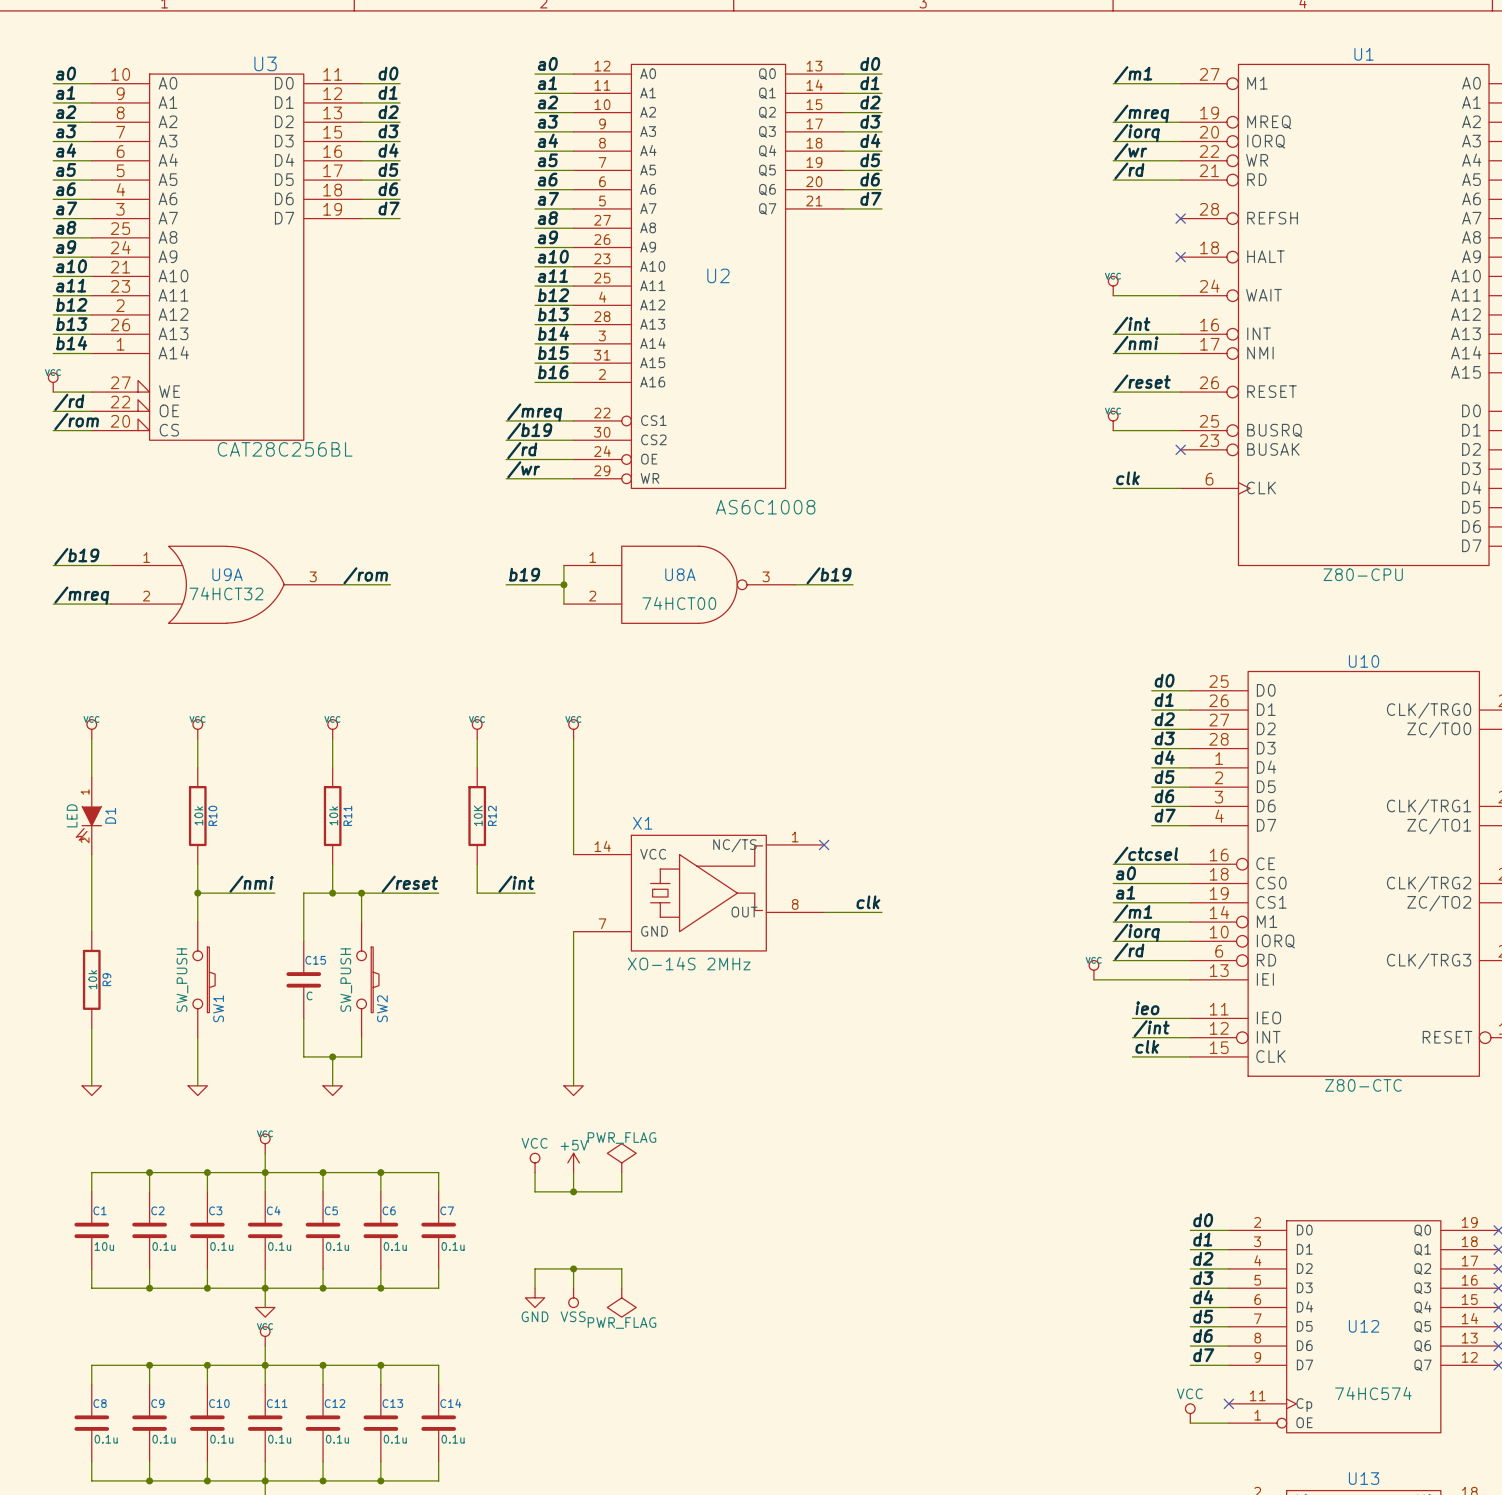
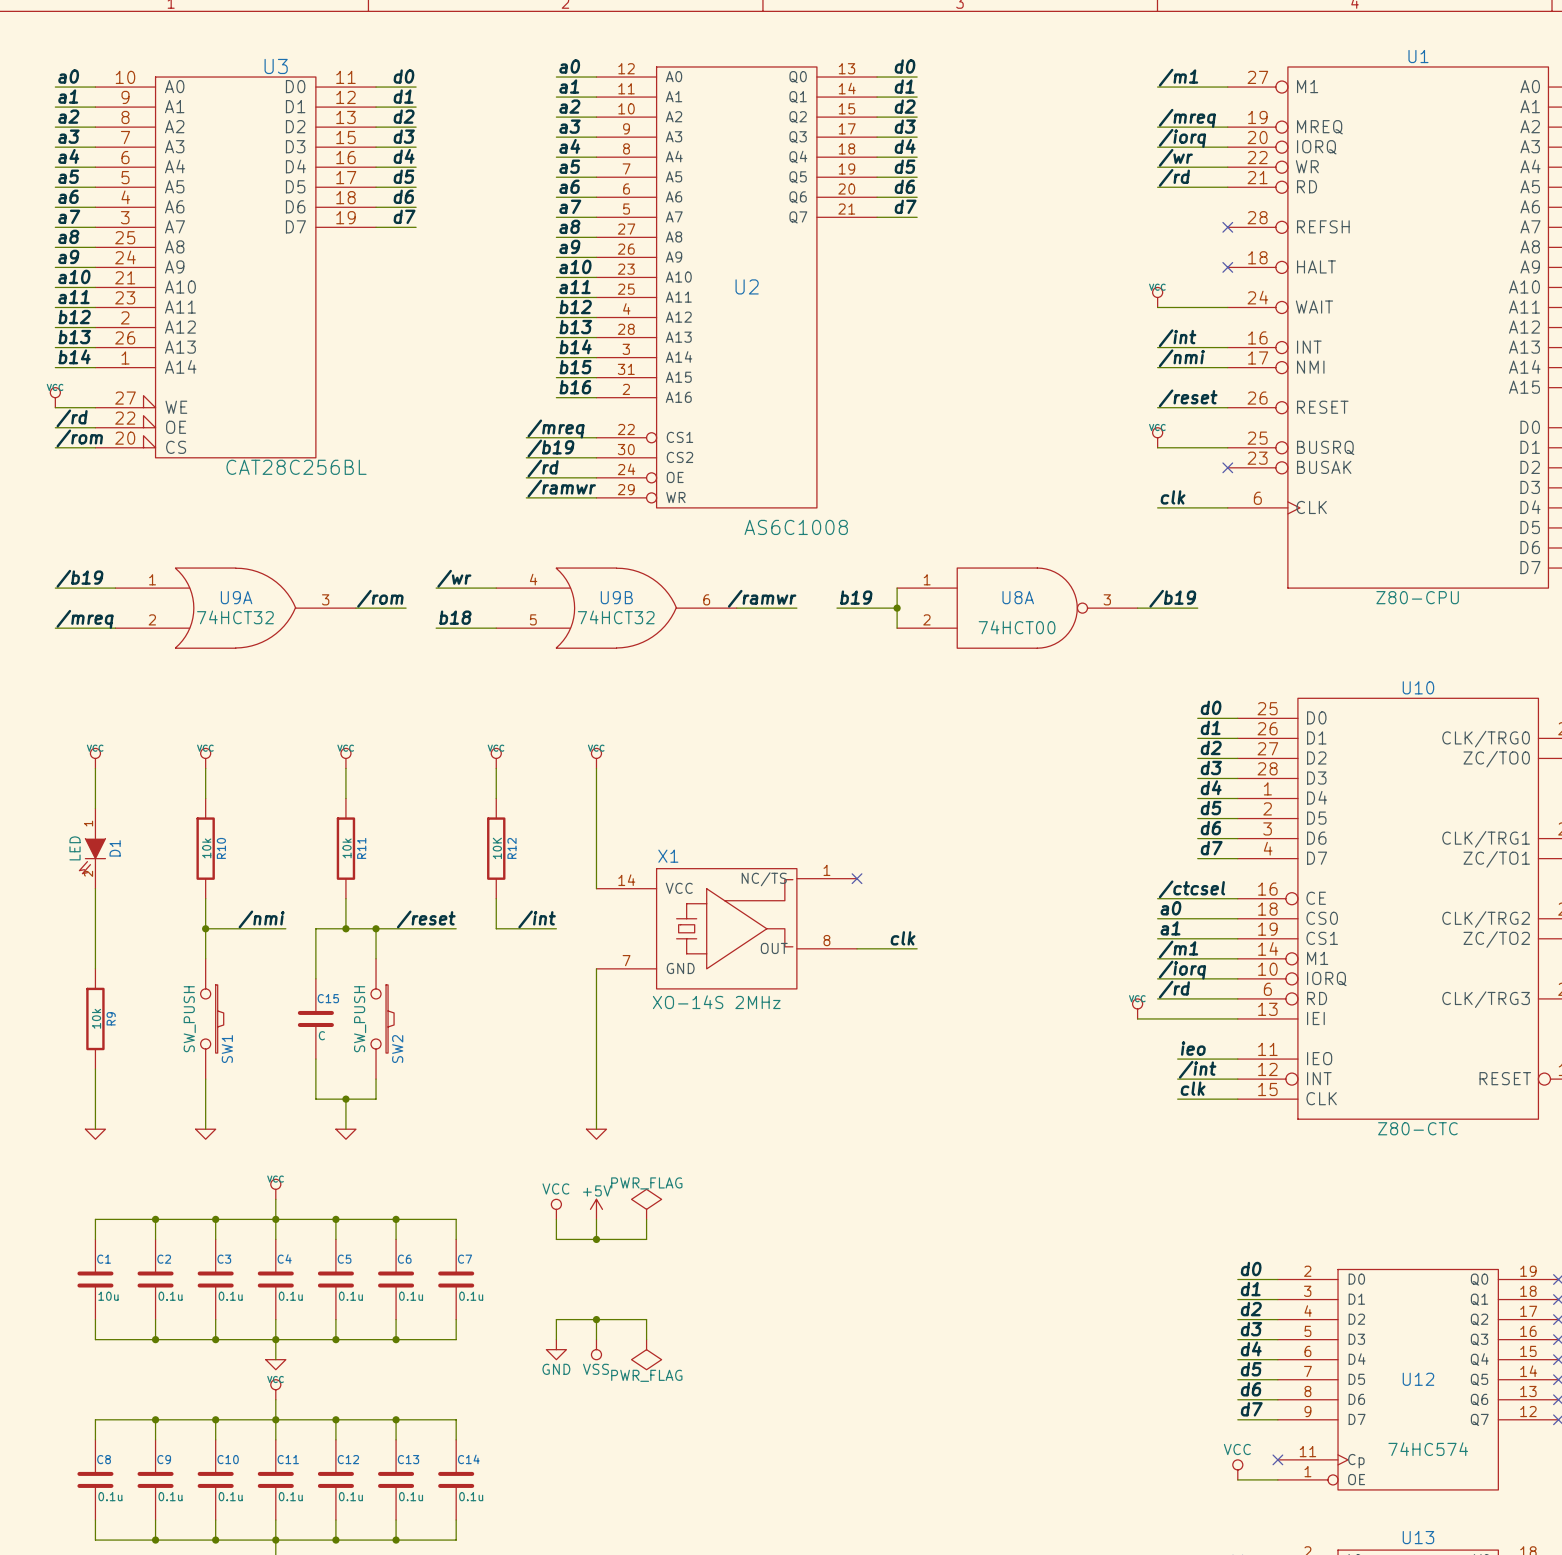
label: /wr (523, 469) -> /ramwr (561, 488)
label: none -> /wr (454, 578)
wire: (563, 565) (563, 604) -> none
wire: none -> (897, 588) (897, 628)
label: b19 (524, 574) -> none
label: none -> /ramwr (762, 598)
label: /b19 (829, 575) -> b19 (856, 597)
label: none -> /b19 (1172, 598)
wire: (506, 584) (563, 584) -> (436, 588) (496, 588)
junction: (563, 584) -> none
U9B: none -> 74HCT32 (616, 608)
U8A position: (679, 584) -> (1017, 608)
wire: none -> (736, 608) (796, 608)
wire: (795, 584) (804, 584) -> (887, 608) (897, 608)
junction: none -> (897, 608)
wire: none -> (1137, 608) (1197, 608)
label: none -> b18 (455, 617)
wire: none -> (436, 628) (496, 628)

